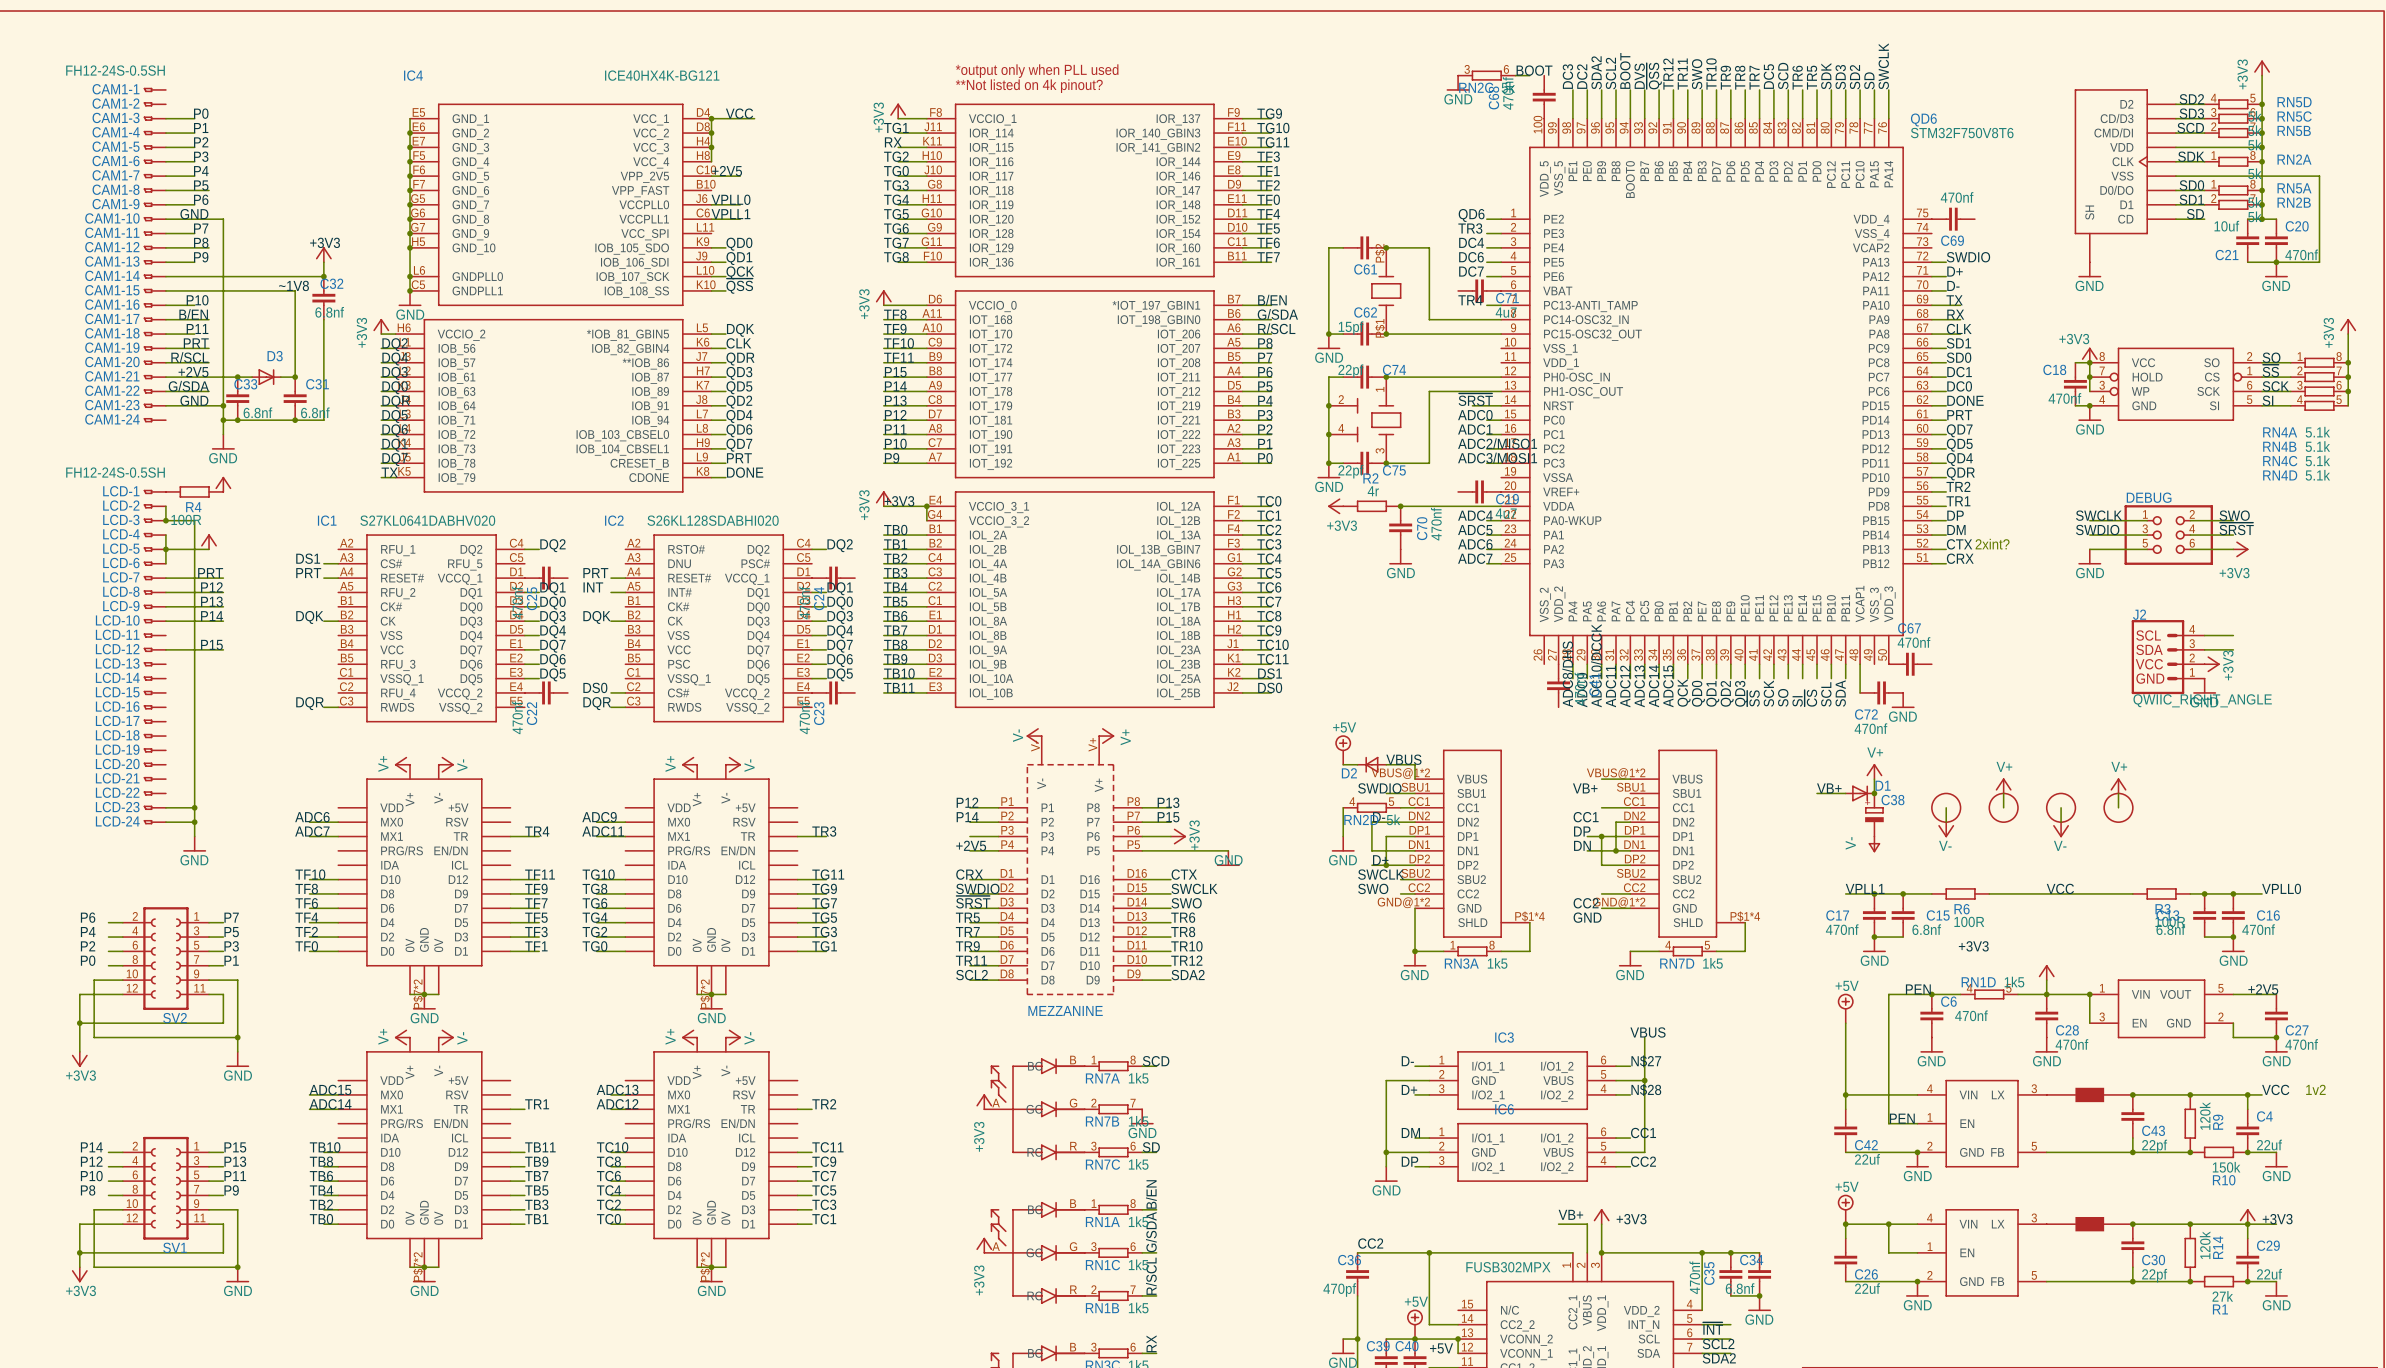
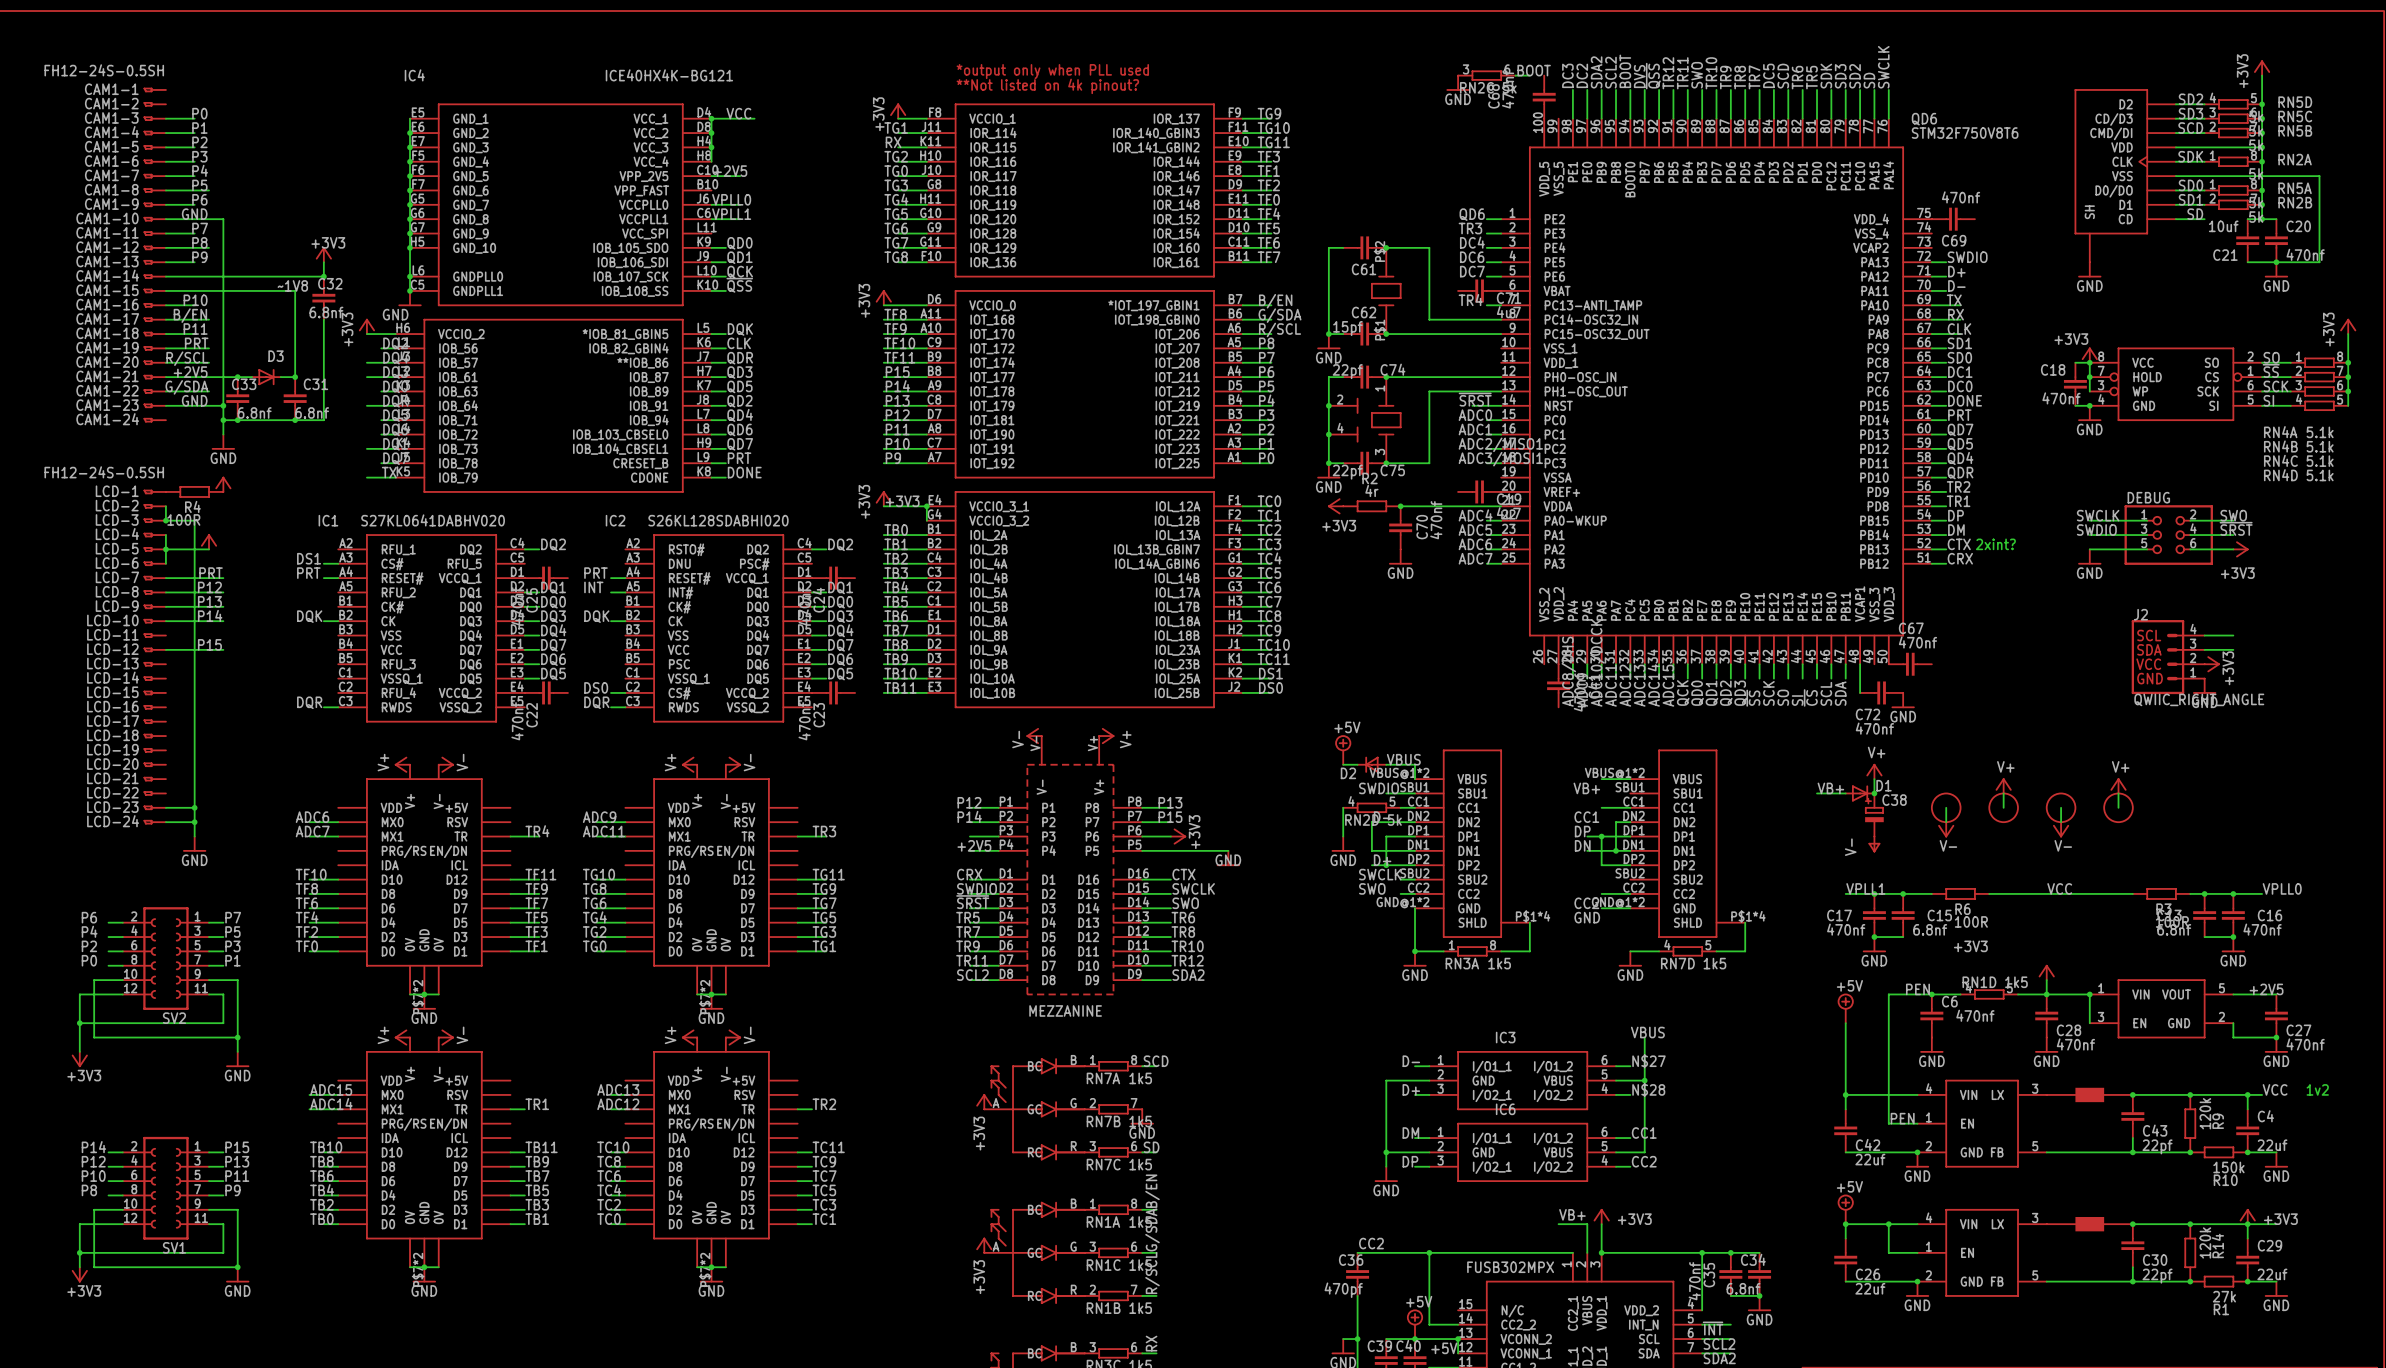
power symbol text position: GND (410, 314) -> GND (395, 314)
power symbol position: +3V3 (381, 326) -> +3V3 (366, 326)
wire: none -> (366, 334) (381, 334)
wire: none -> (366, 362) (381, 362)
wire: none -> (366, 377) (381, 377)
wire: none -> (366, 405) (381, 405)
wire: none -> (366, 448) (381, 448)
wire: none -> (366, 477) (381, 477)

